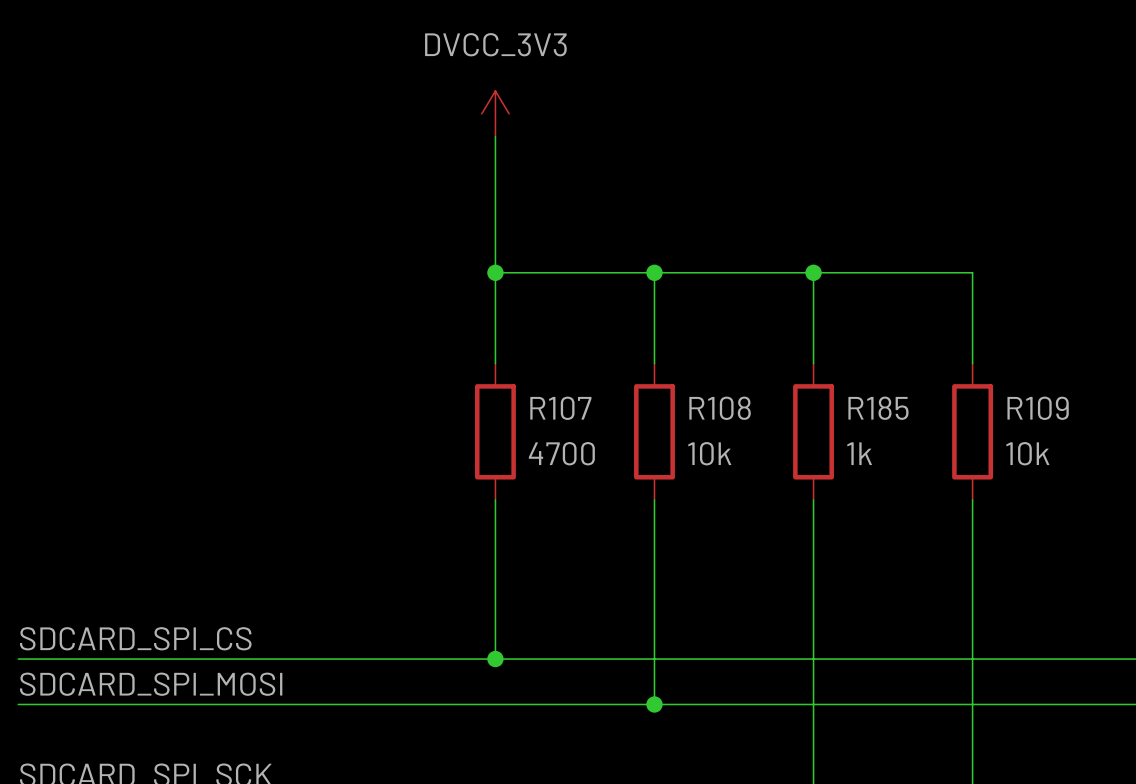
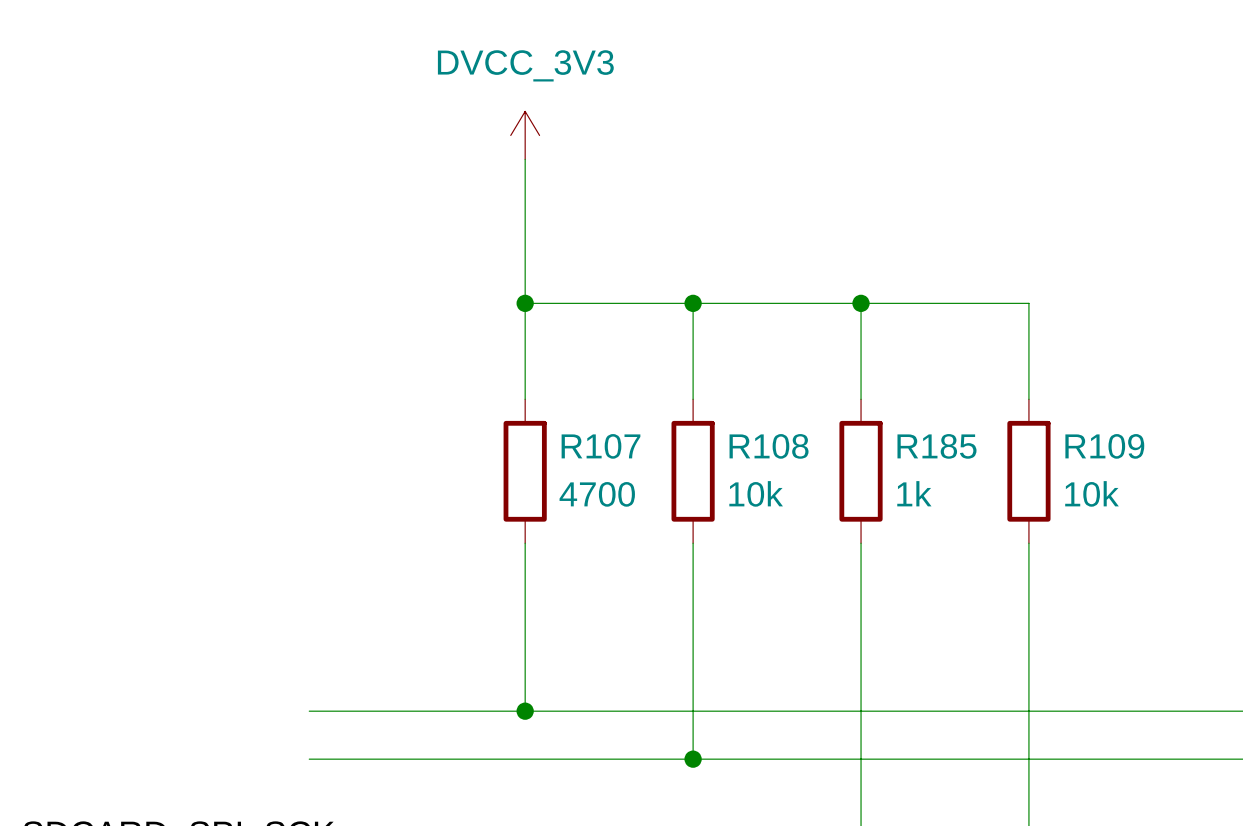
label: SDCARD_SPI_CS (135, 638) -> none
wire: (18, 659) (290, 659) -> none
label: SDCARD_SPI_MOSI (151, 684) -> none
wire: (18, 704) (290, 704) -> none

